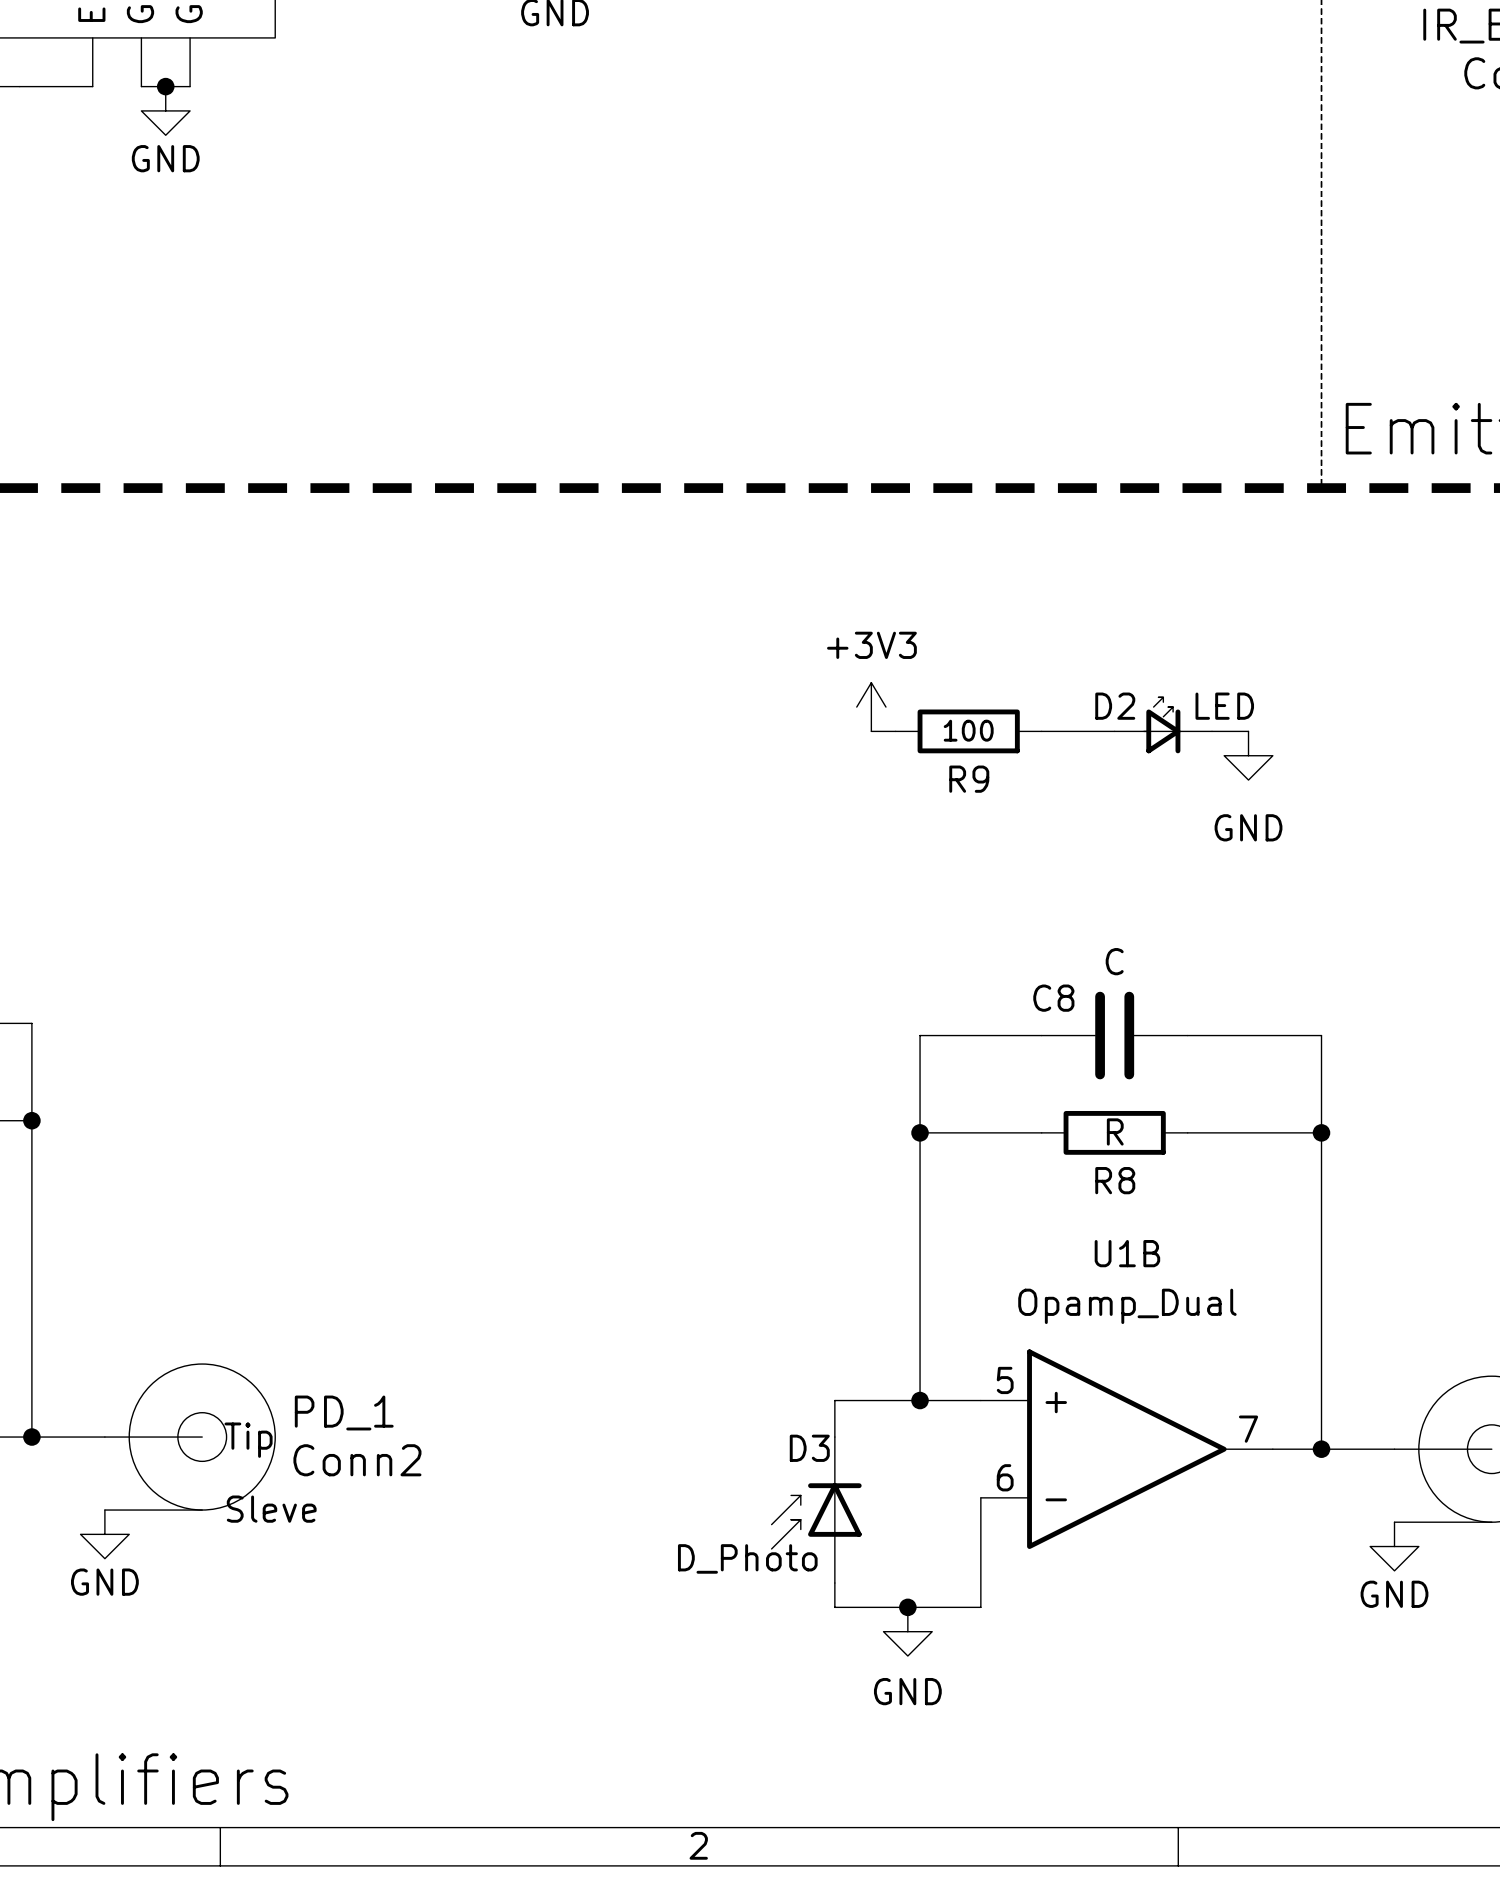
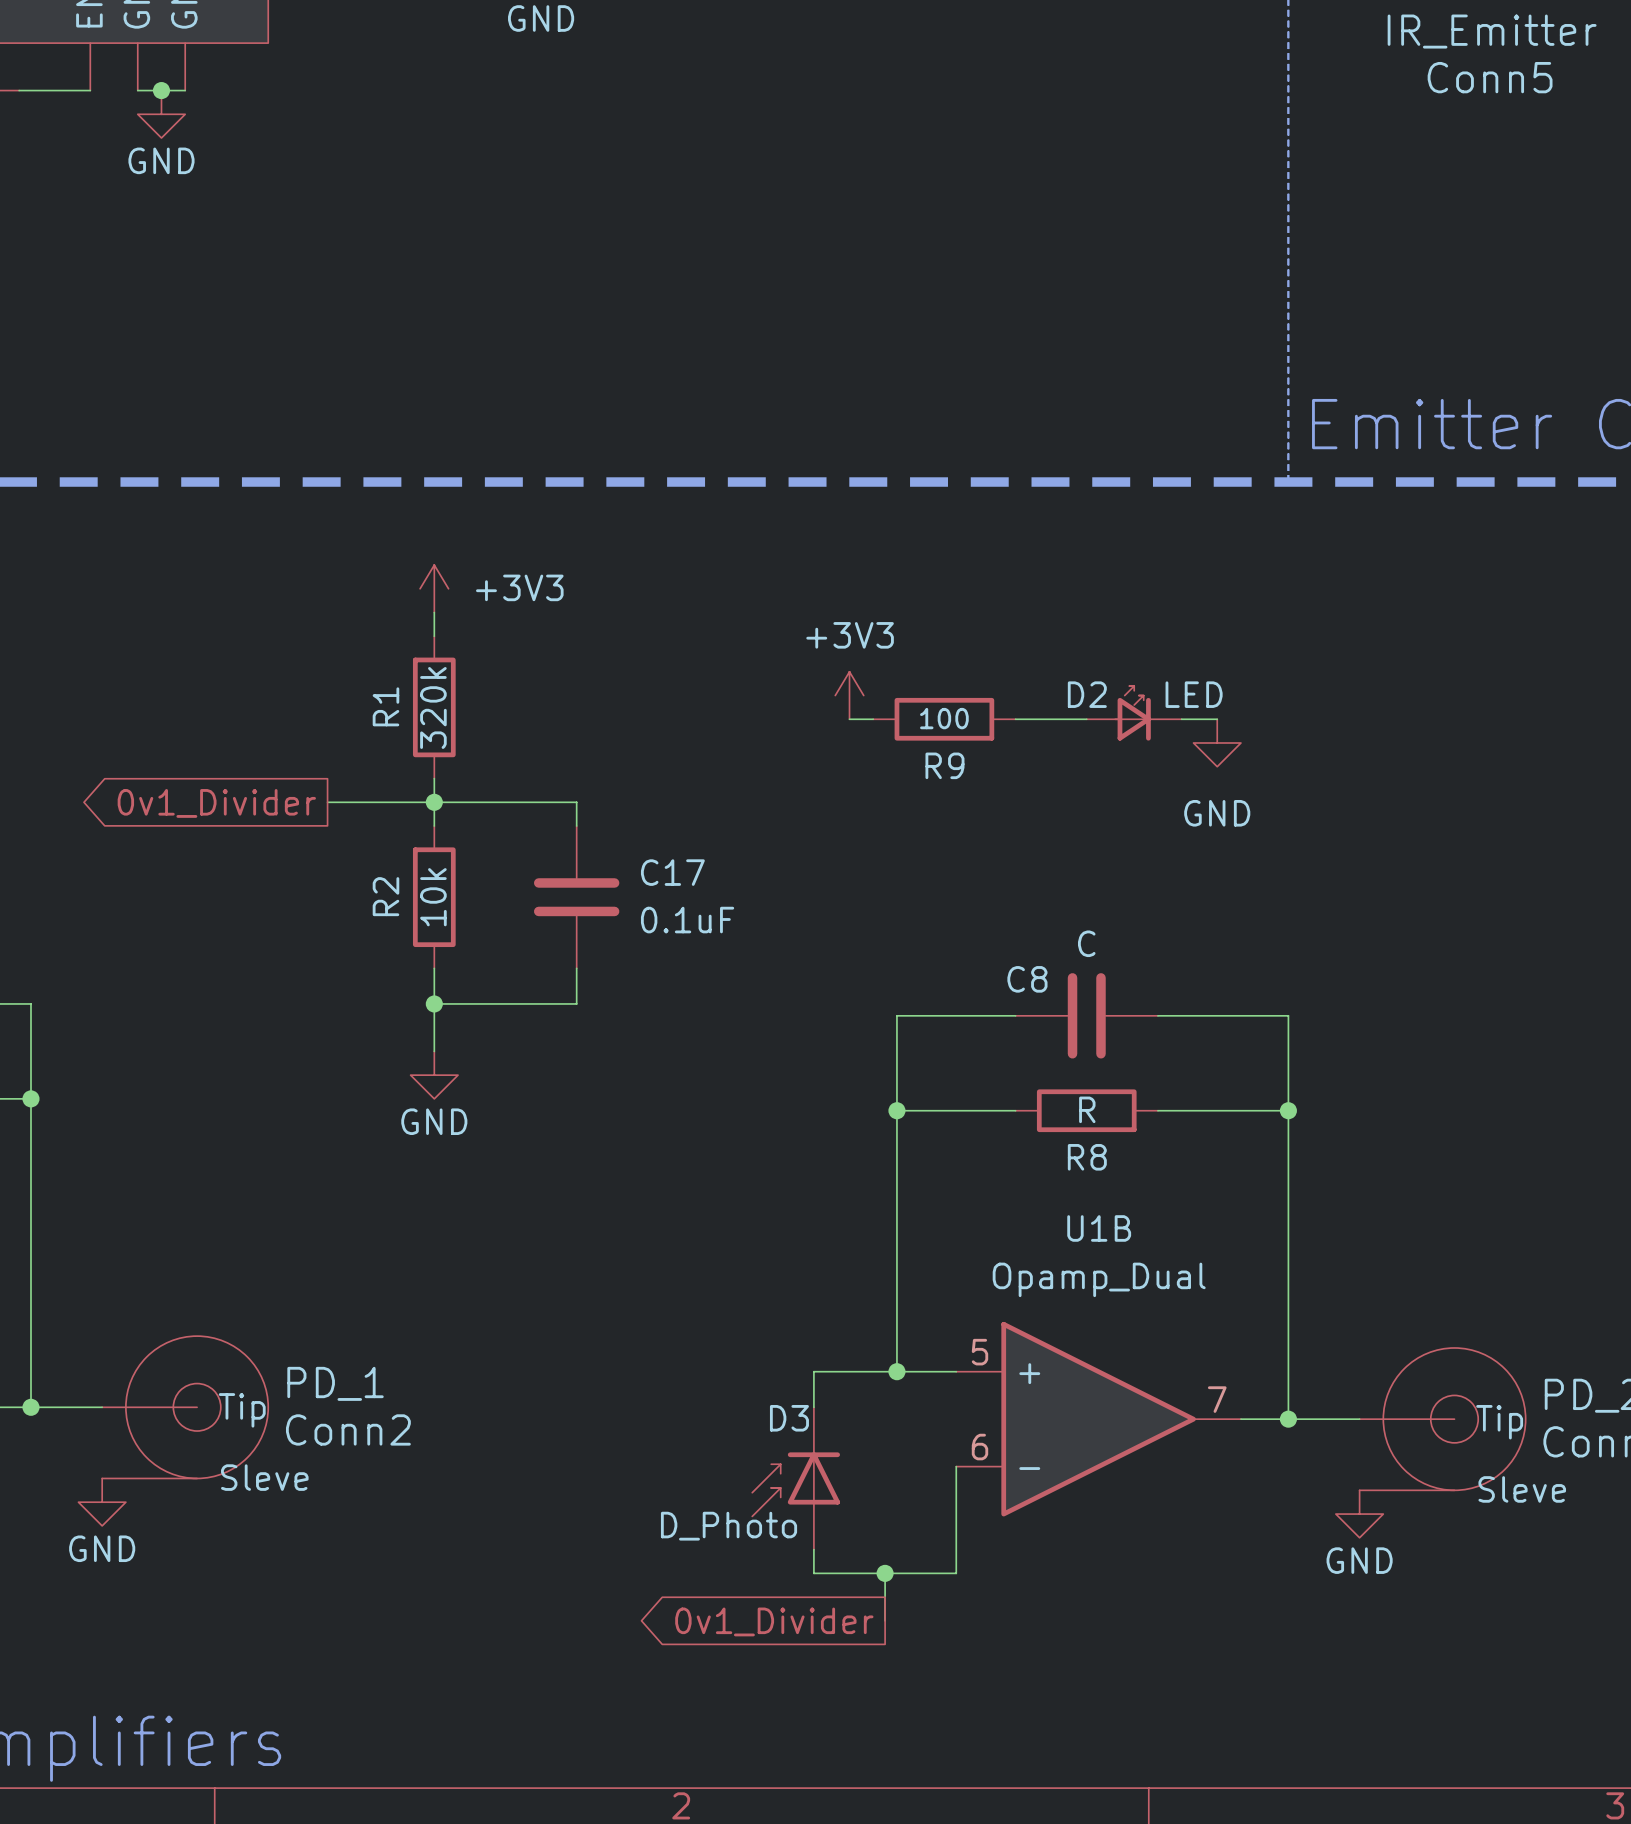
power symbol: none -> +3V3 (434, 588)
wire: none -> (434, 612) (434, 636)
R1: none -> 320k (434, 707)
wire: none -> (434, 778) (434, 826)
wire: none -> (327, 802) (576, 802) (576, 826)
junction: none -> (434, 802)
global label: none -> 0v1_Divider (216, 803)
R2: none -> 10k (434, 897)
C17: none -> 0.1uF (576, 897)
wire: none -> (434, 968) (434, 1051)
wire: none -> (576, 968) (576, 1003) (434, 1003)
junction: none -> (434, 1003)
power symbol: none -> GND (434, 1075)
power symbol: GND (907, 1631) -> none
global label: none -> 0v1_Divider (774, 1621)

